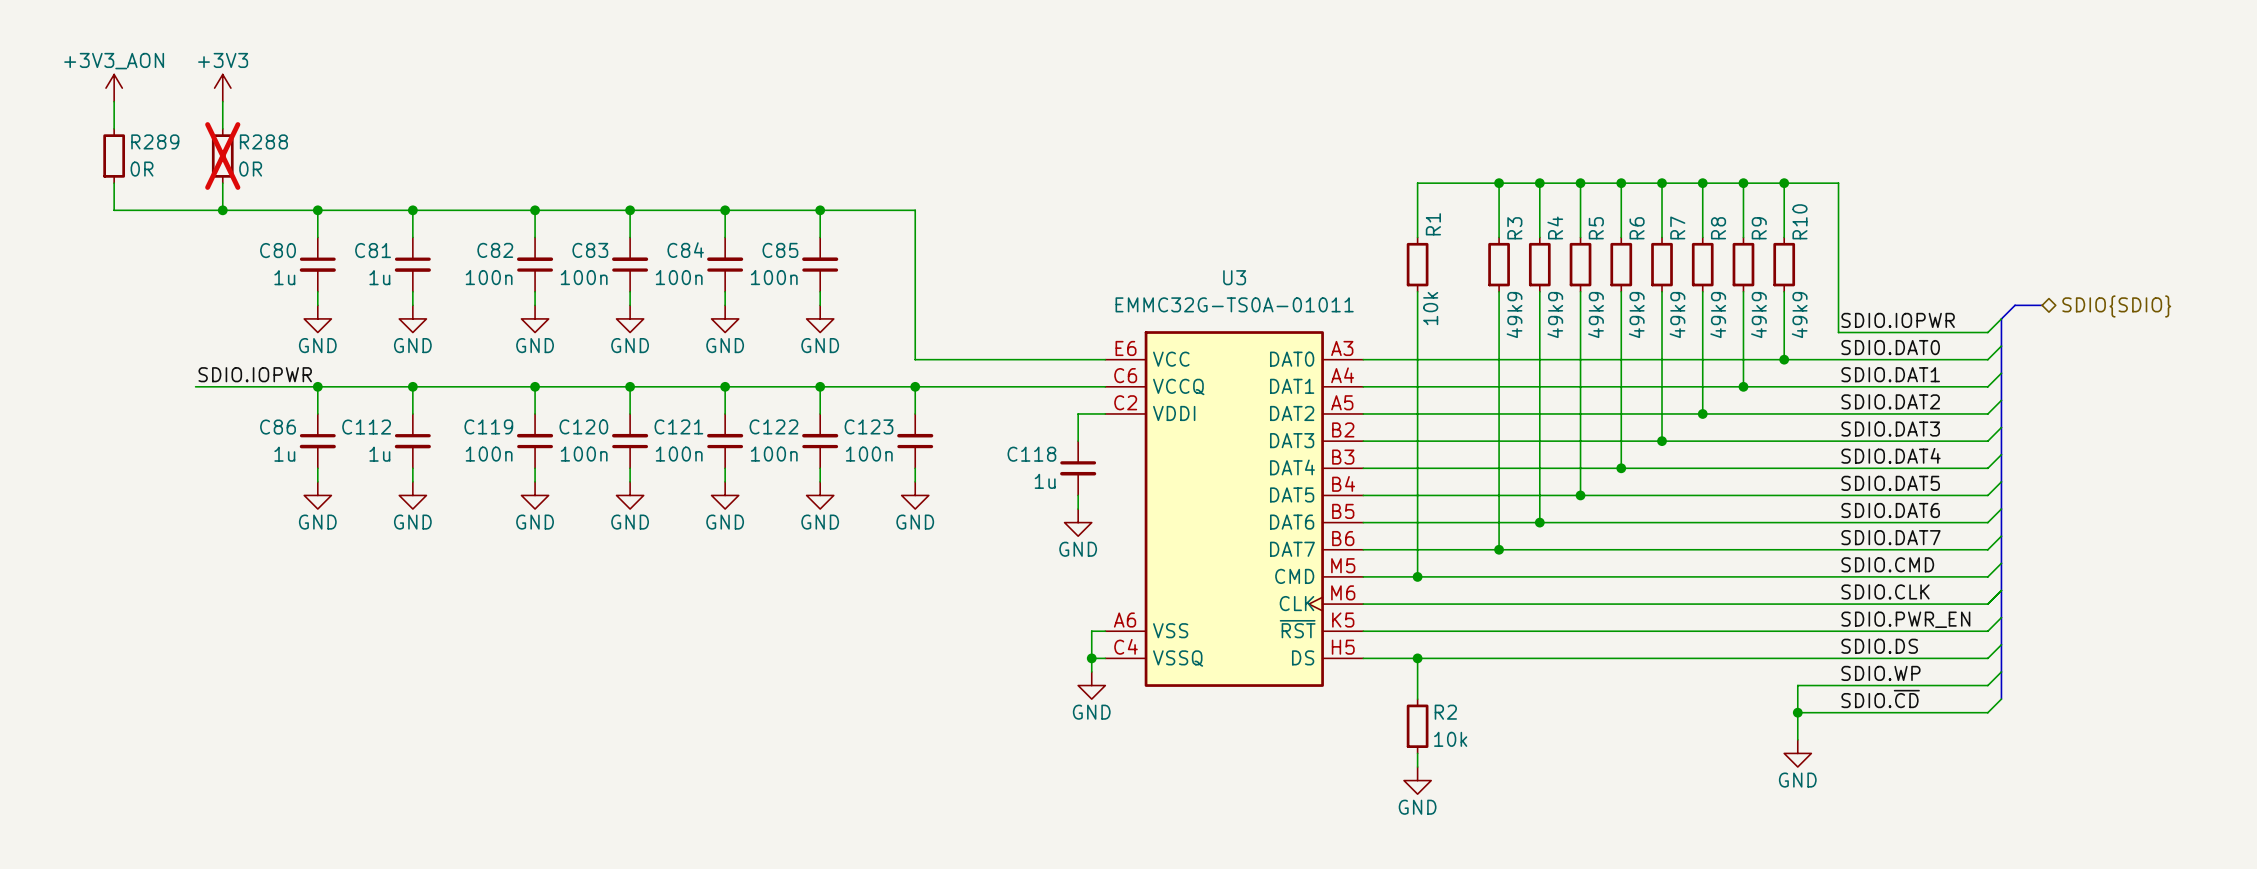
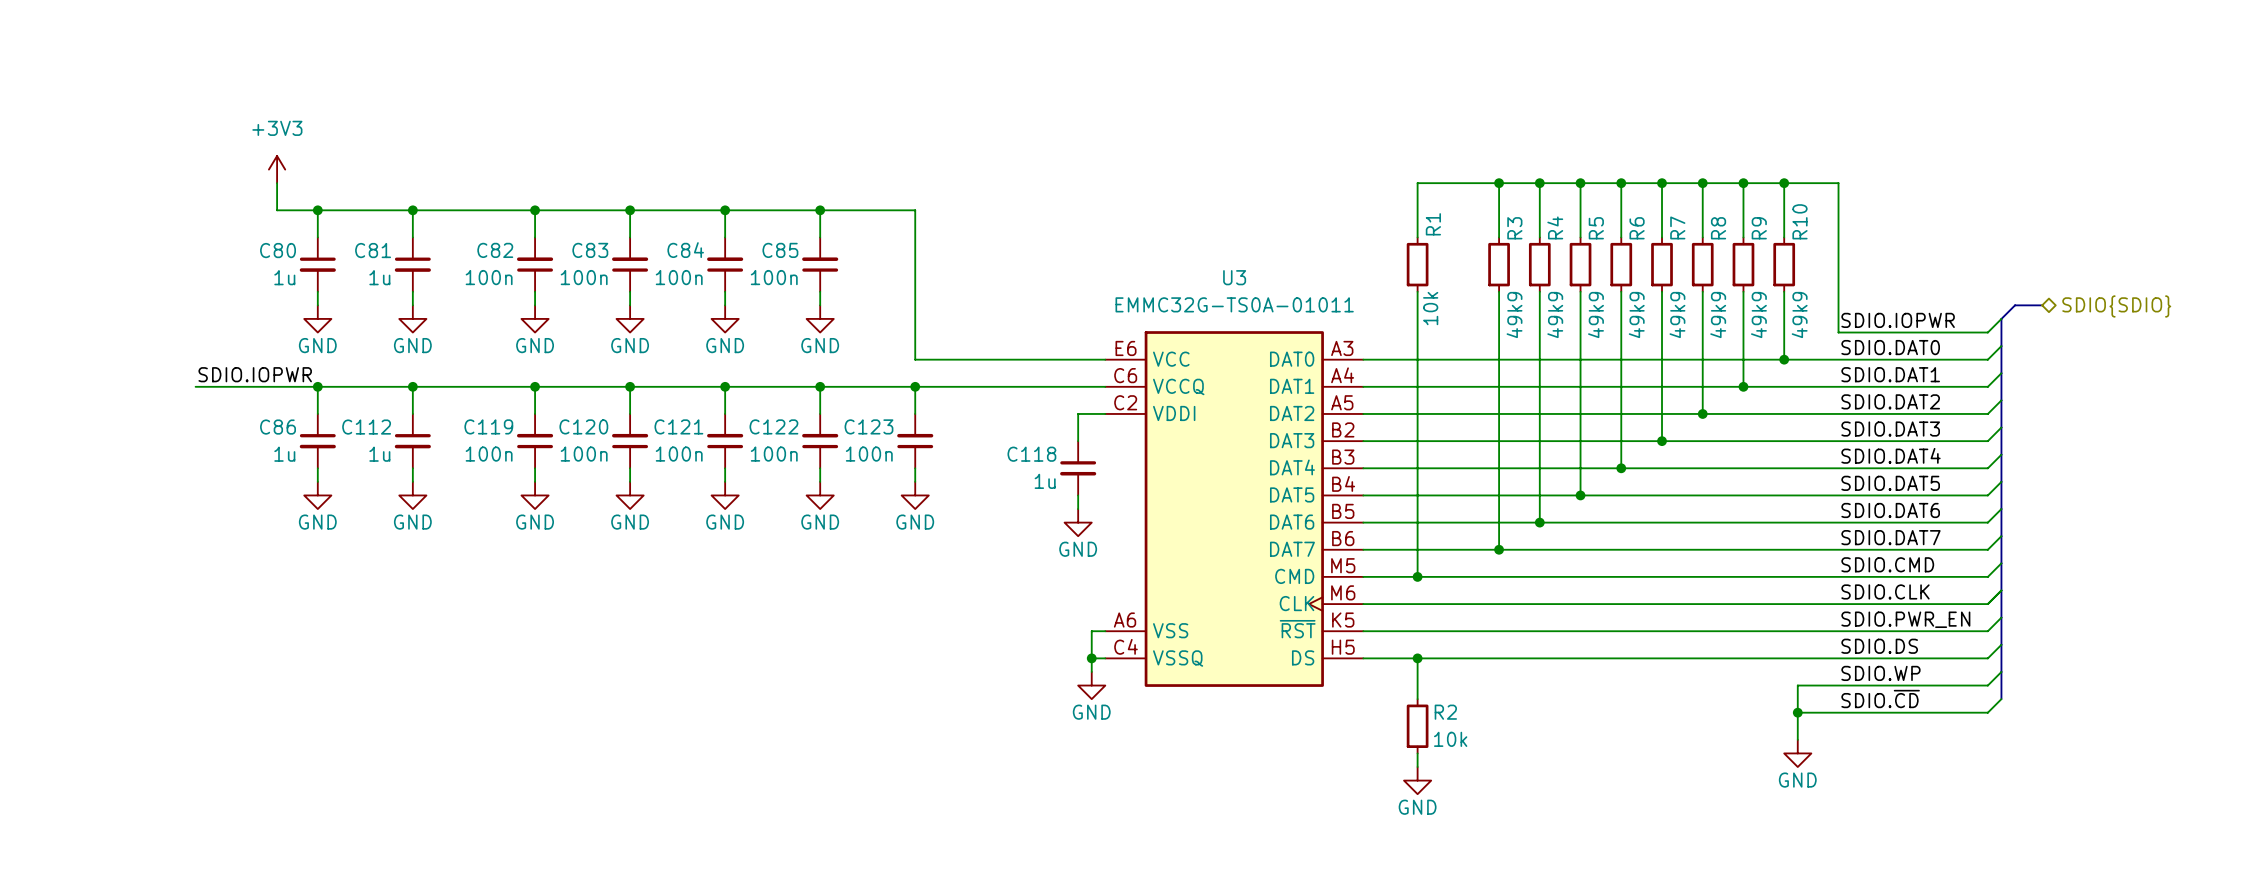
power symbol text position: +3V3 (223, 60) -> +3V3 (277, 128)
power symbol: +3V3_AON (114, 88) -> none
power symbol position: +3V3 (222, 88) -> +3V3 (277, 169)
wire: (114, 101) (114, 128) -> none
wire: (222, 101) (222, 128) -> none
R289: (114, 156) -> none
R288: (222, 156) -> none
wire: (114, 183) (114, 210) (277, 210) -> (277, 183) (277, 210)
wire: (222, 183) (222, 210) -> none
junction: (222, 210) -> none

